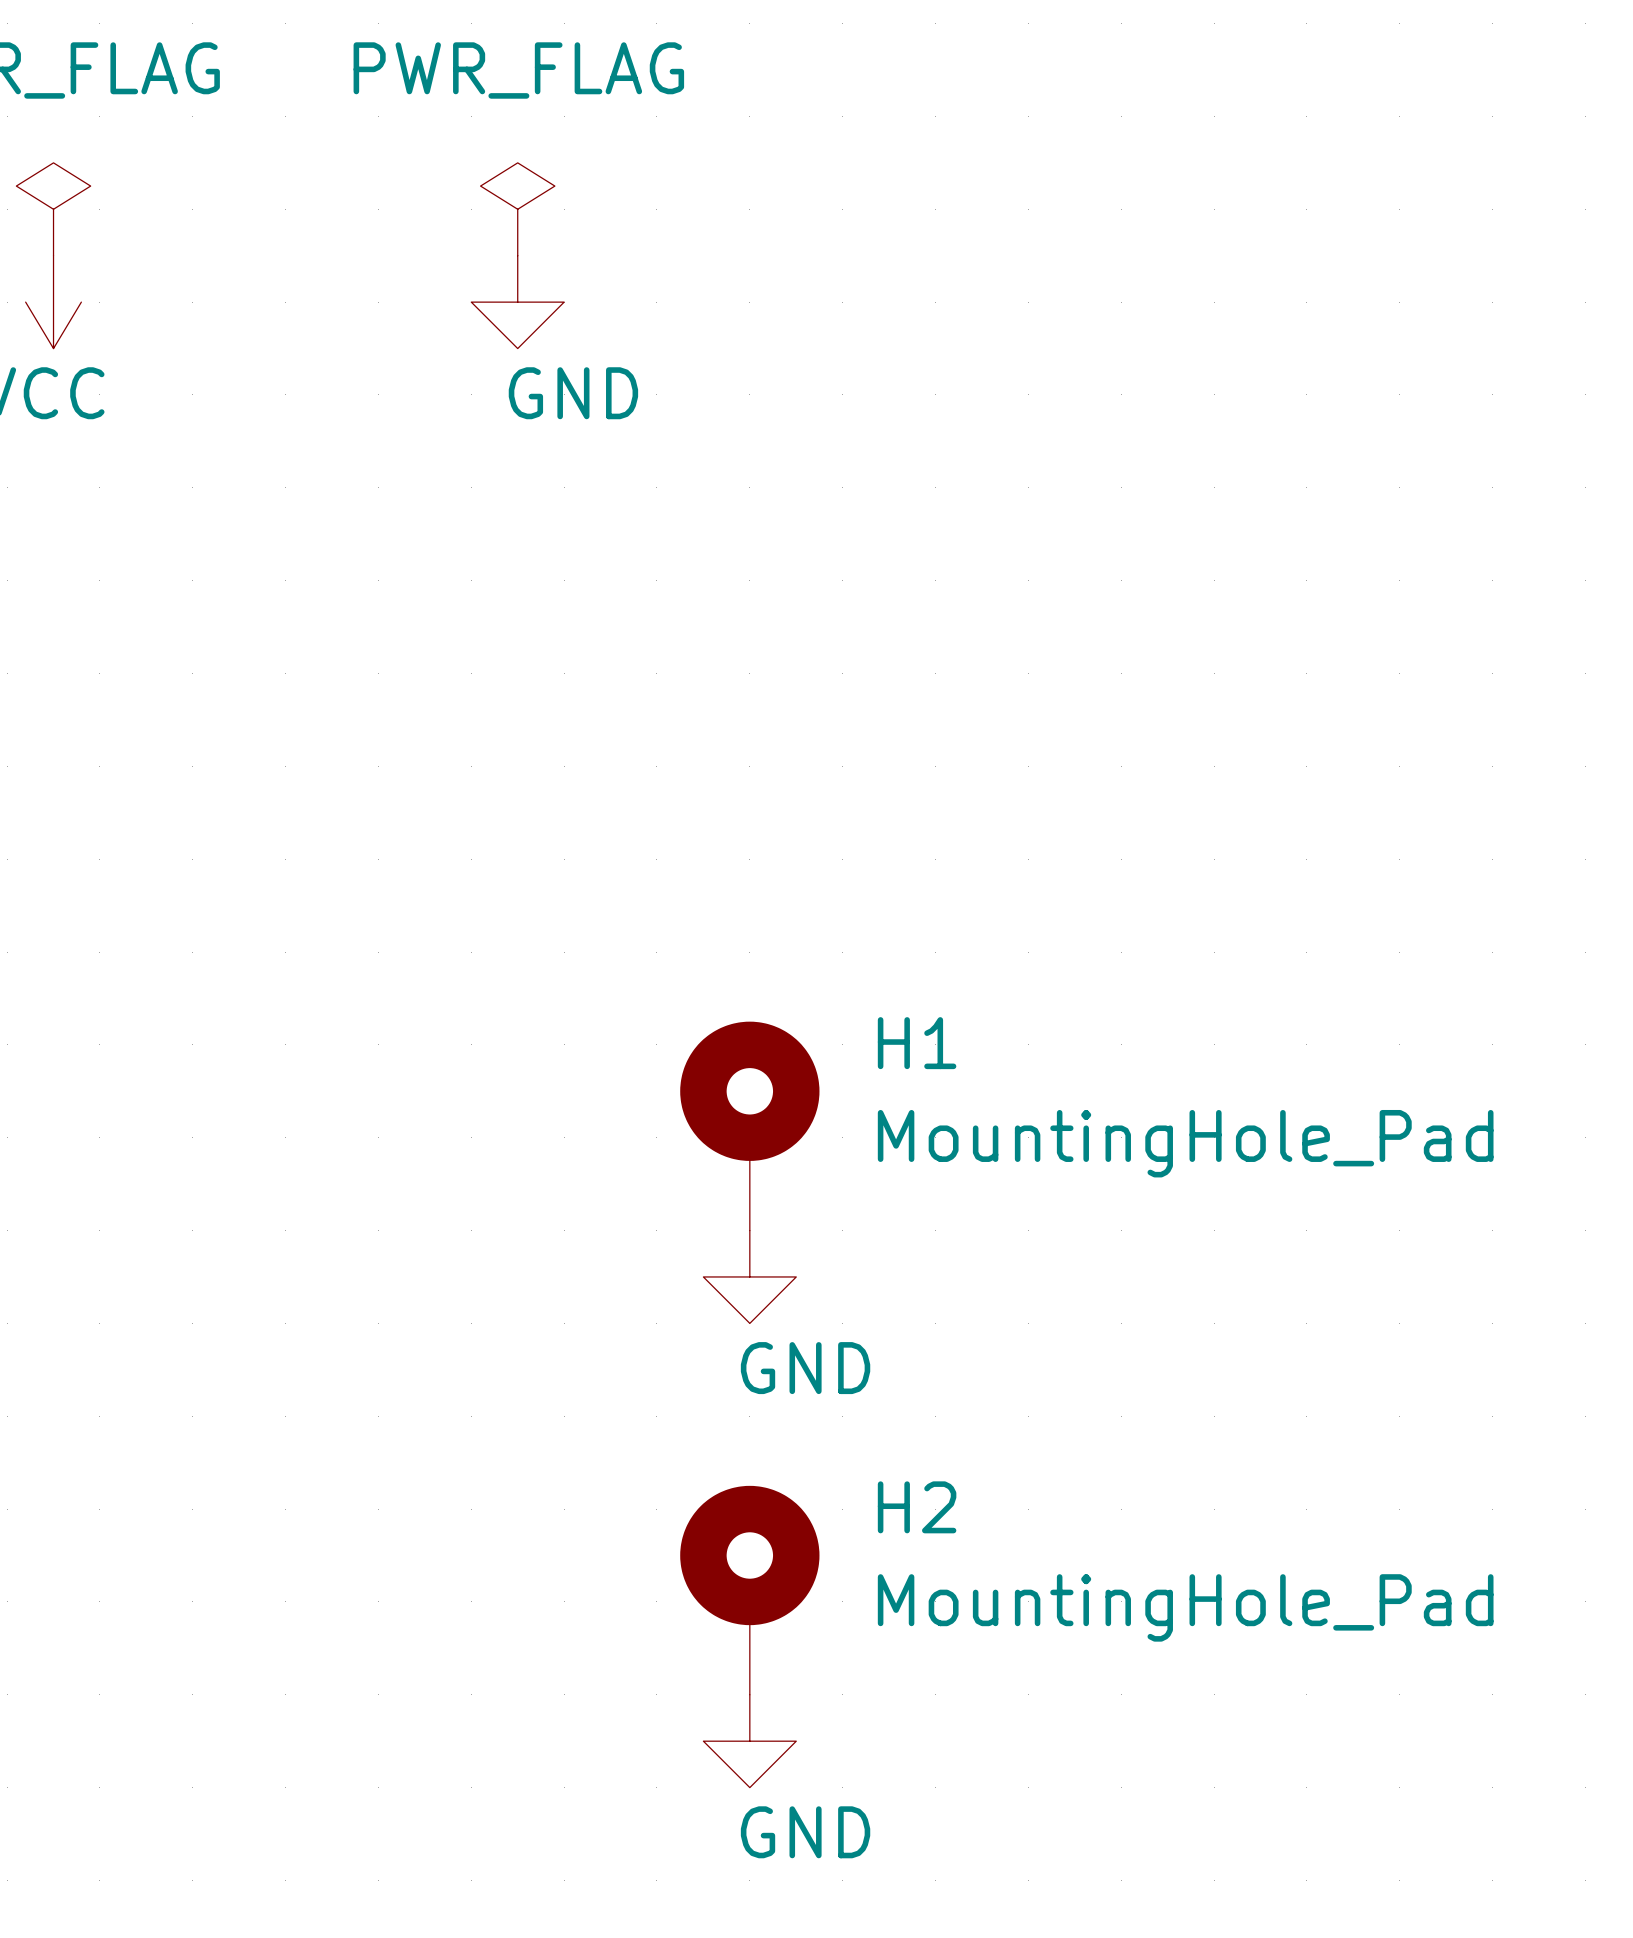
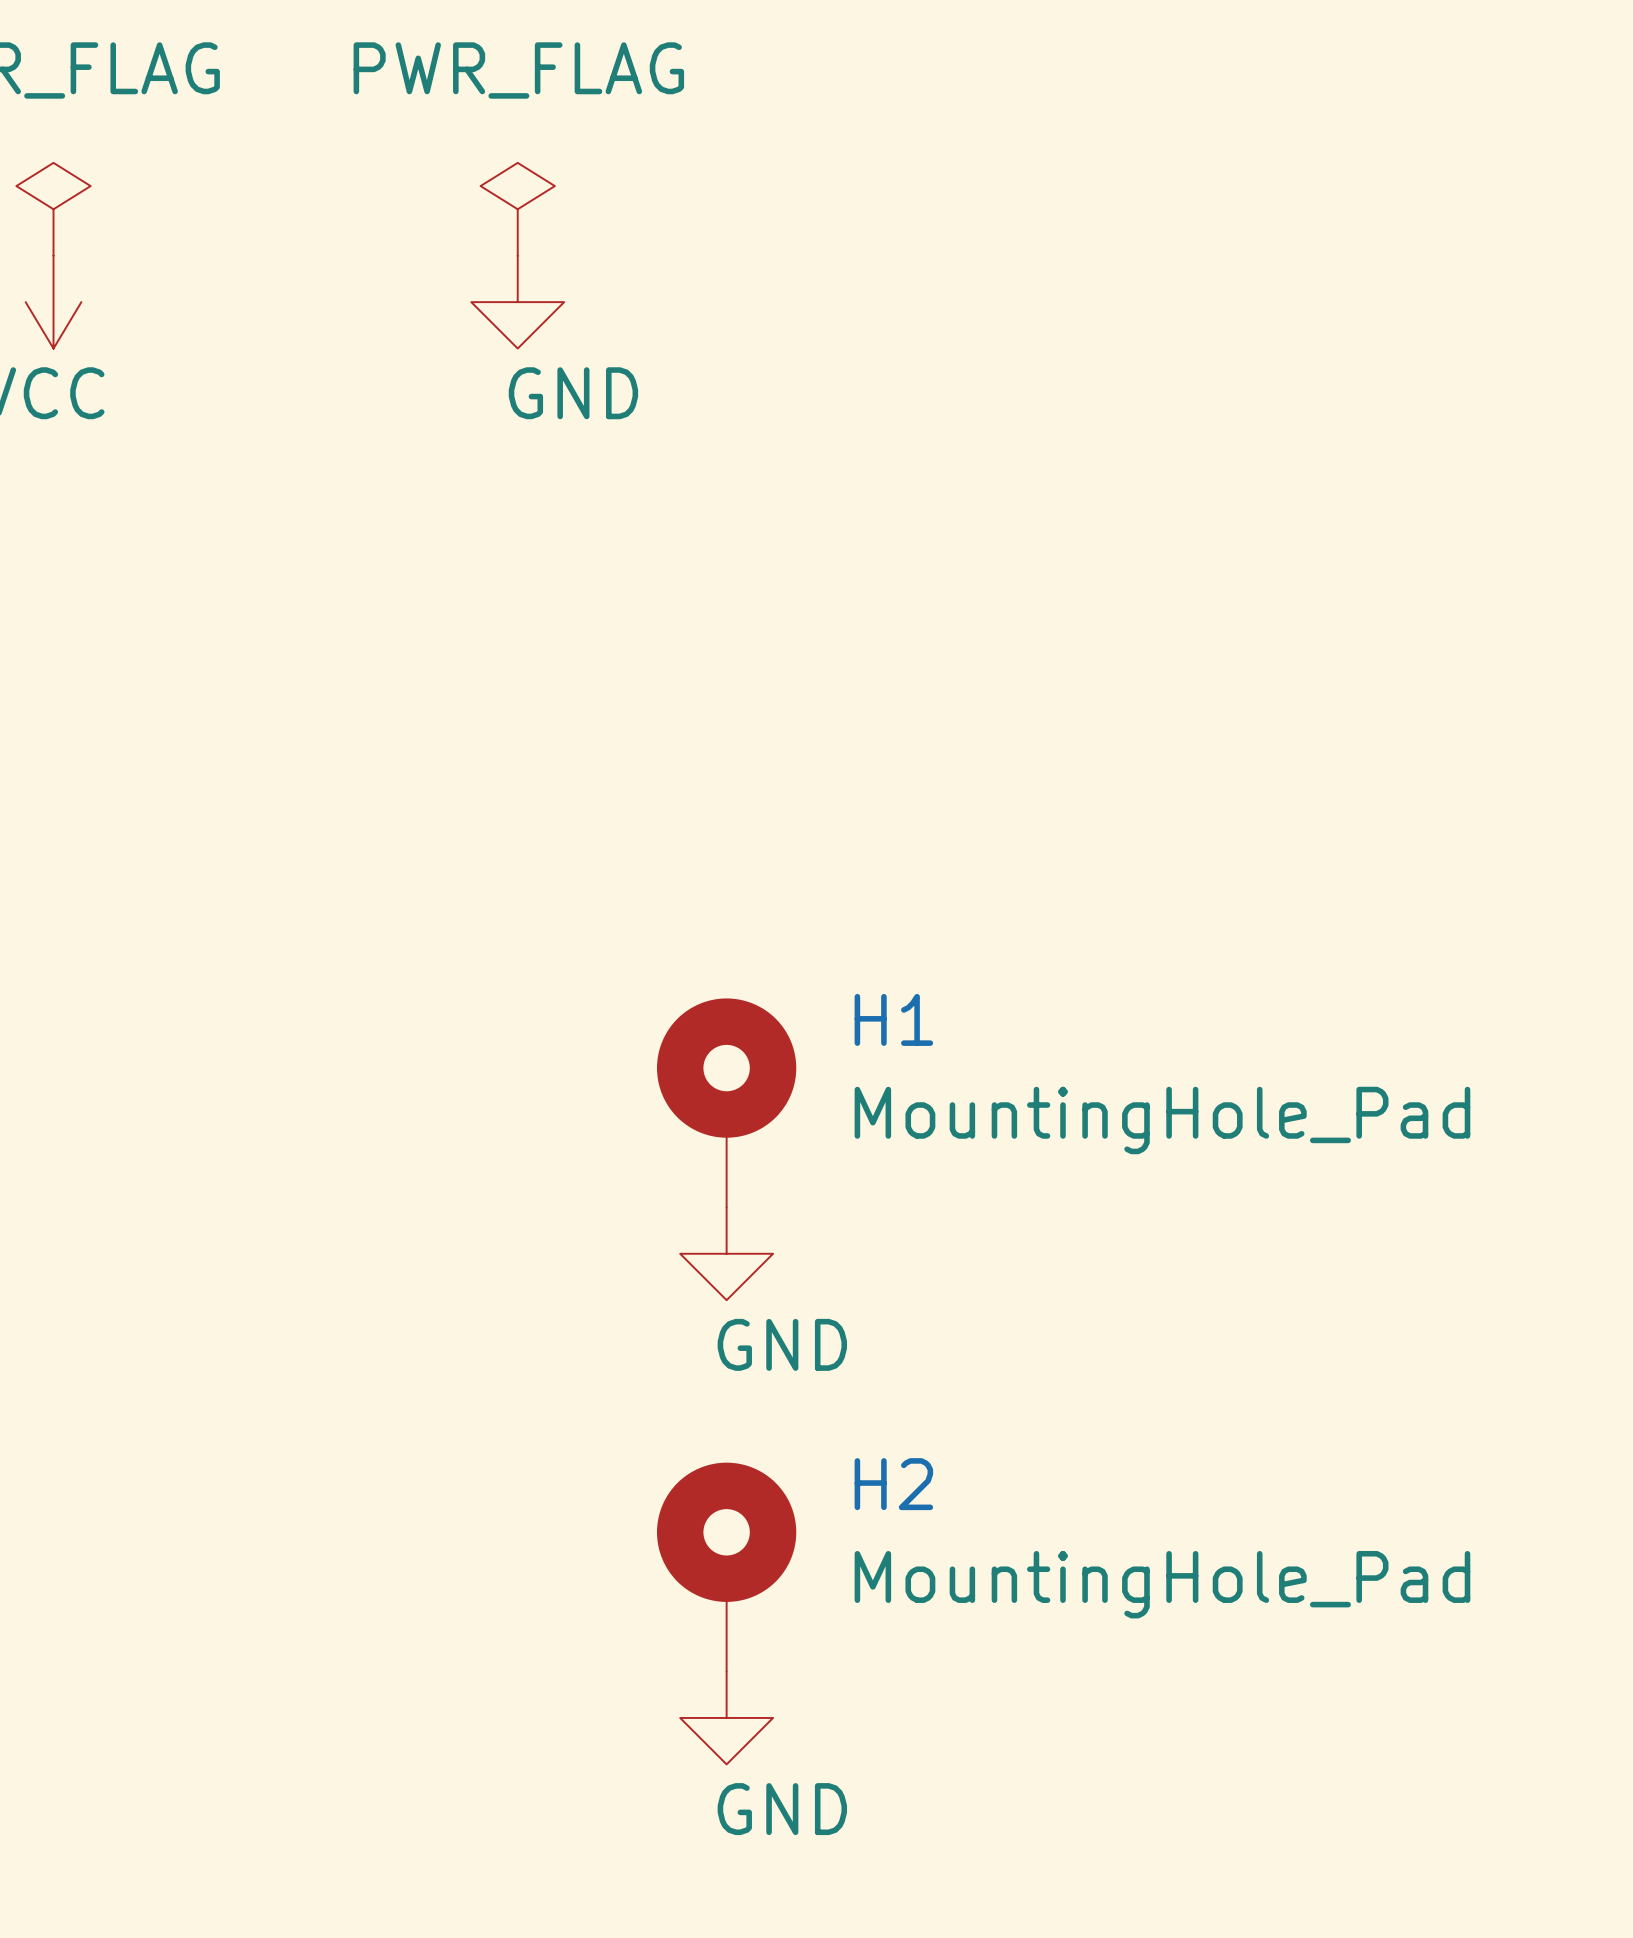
H1 position: (749, 1126) -> (726, 1102)
power symbol position: GND (749, 1276) -> GND (726, 1253)
H2 position: (749, 1590) -> (726, 1567)
power symbol position: GND (749, 1741) -> GND (726, 1717)

